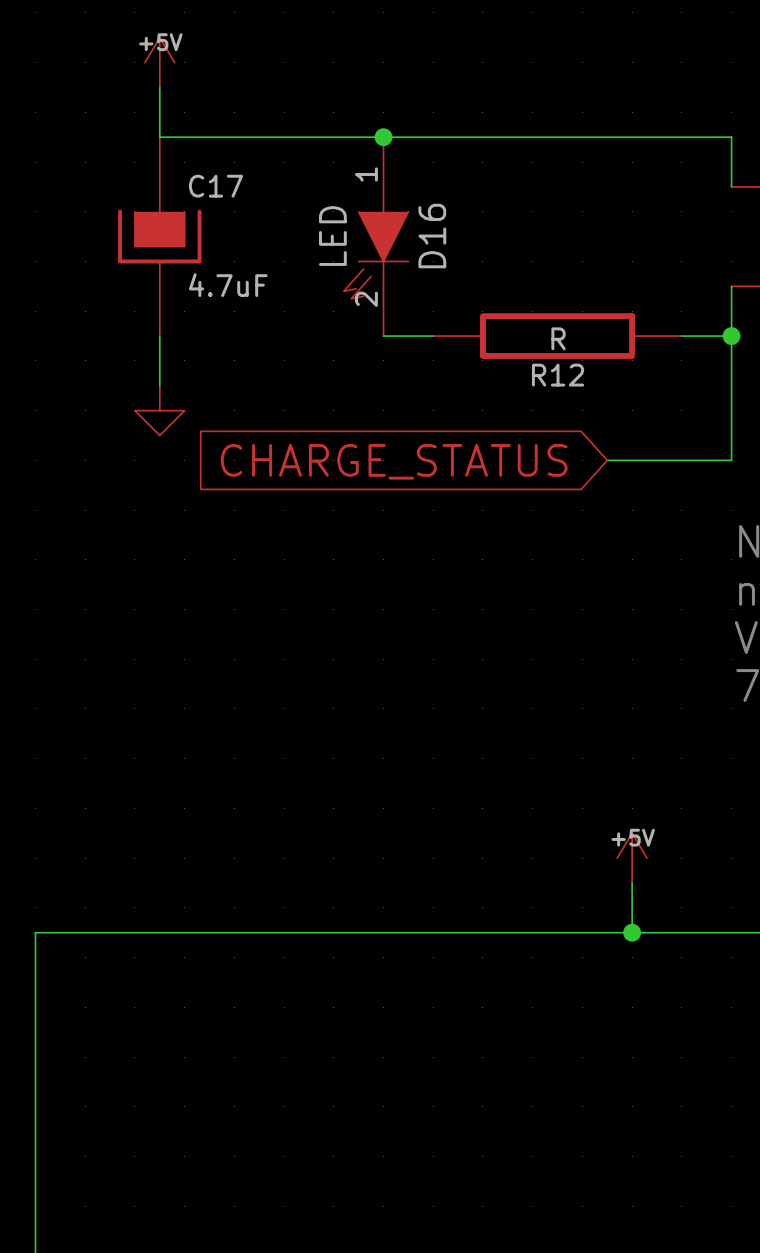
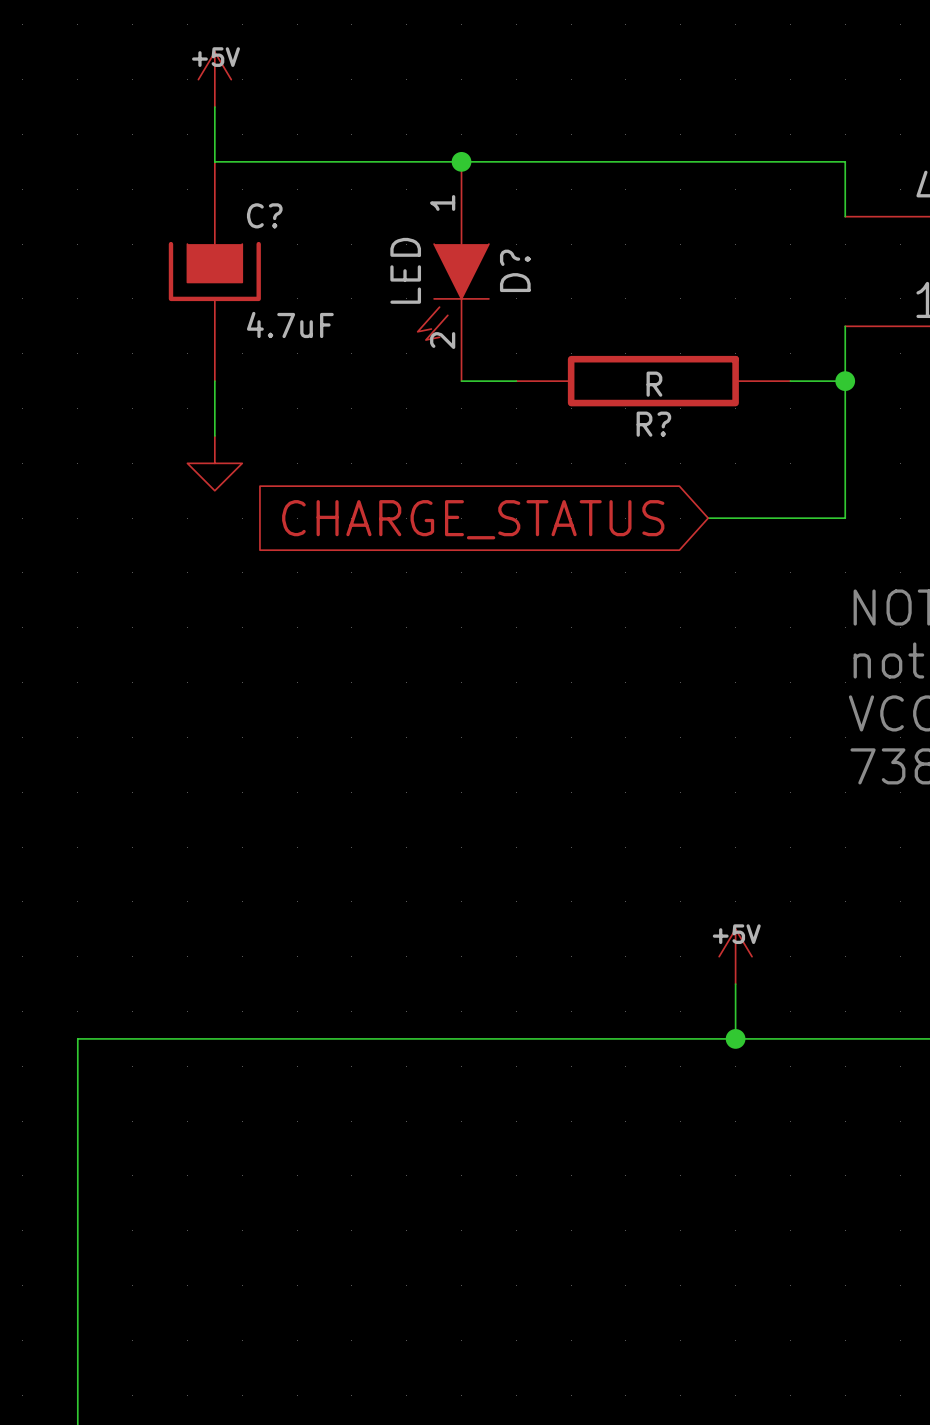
C17 name: C17 (215, 186) -> C? (264, 215)
D16 name: D16 (432, 236) -> D? (515, 270)
R12 name: R12 (558, 375) -> R? (653, 424)

